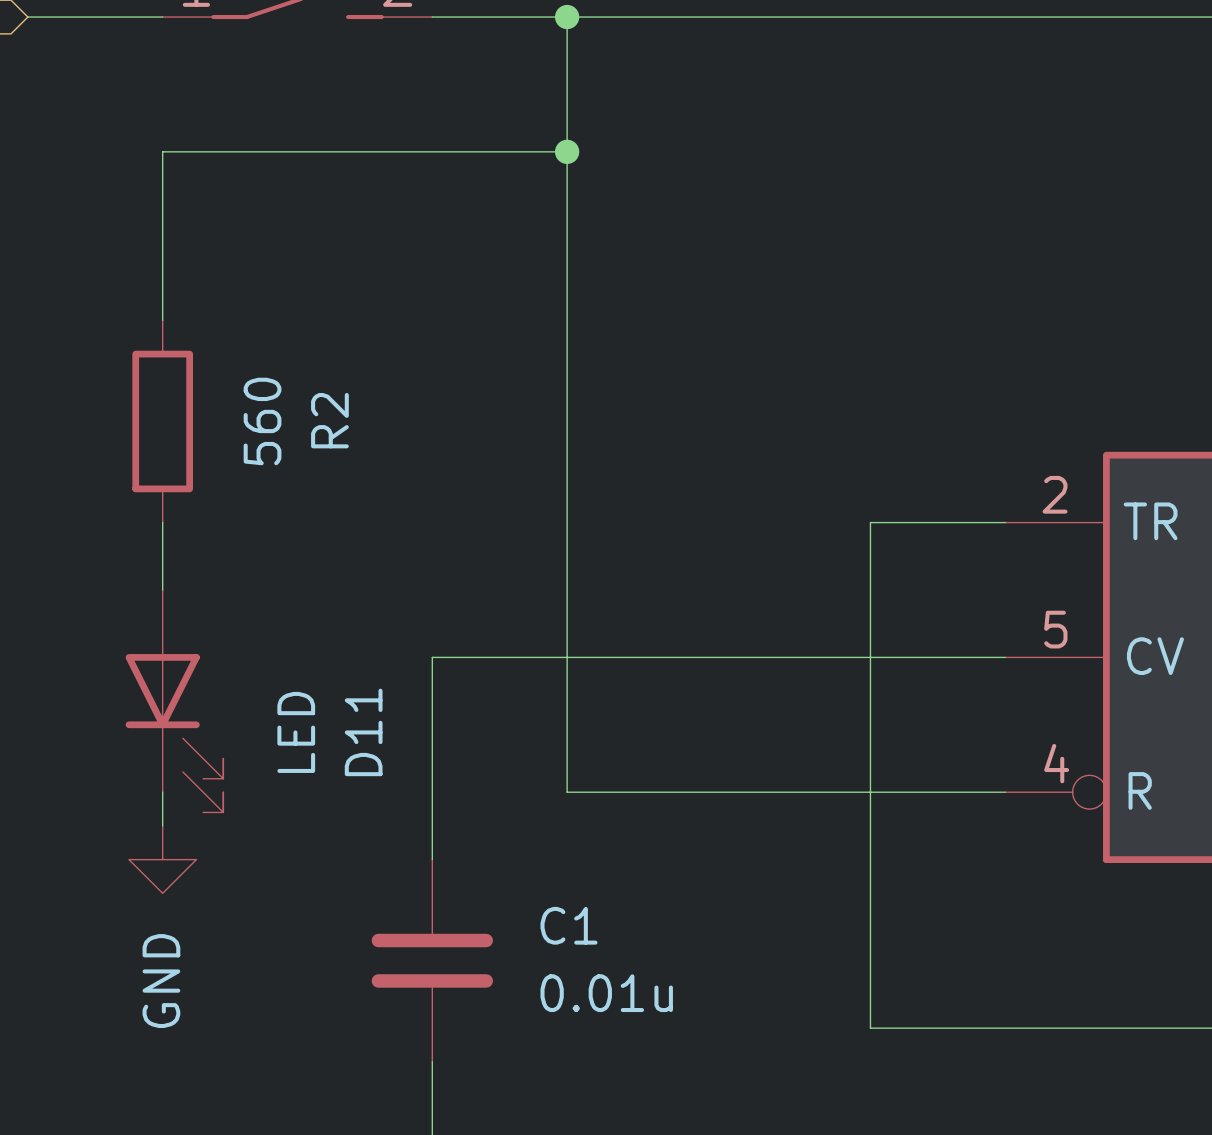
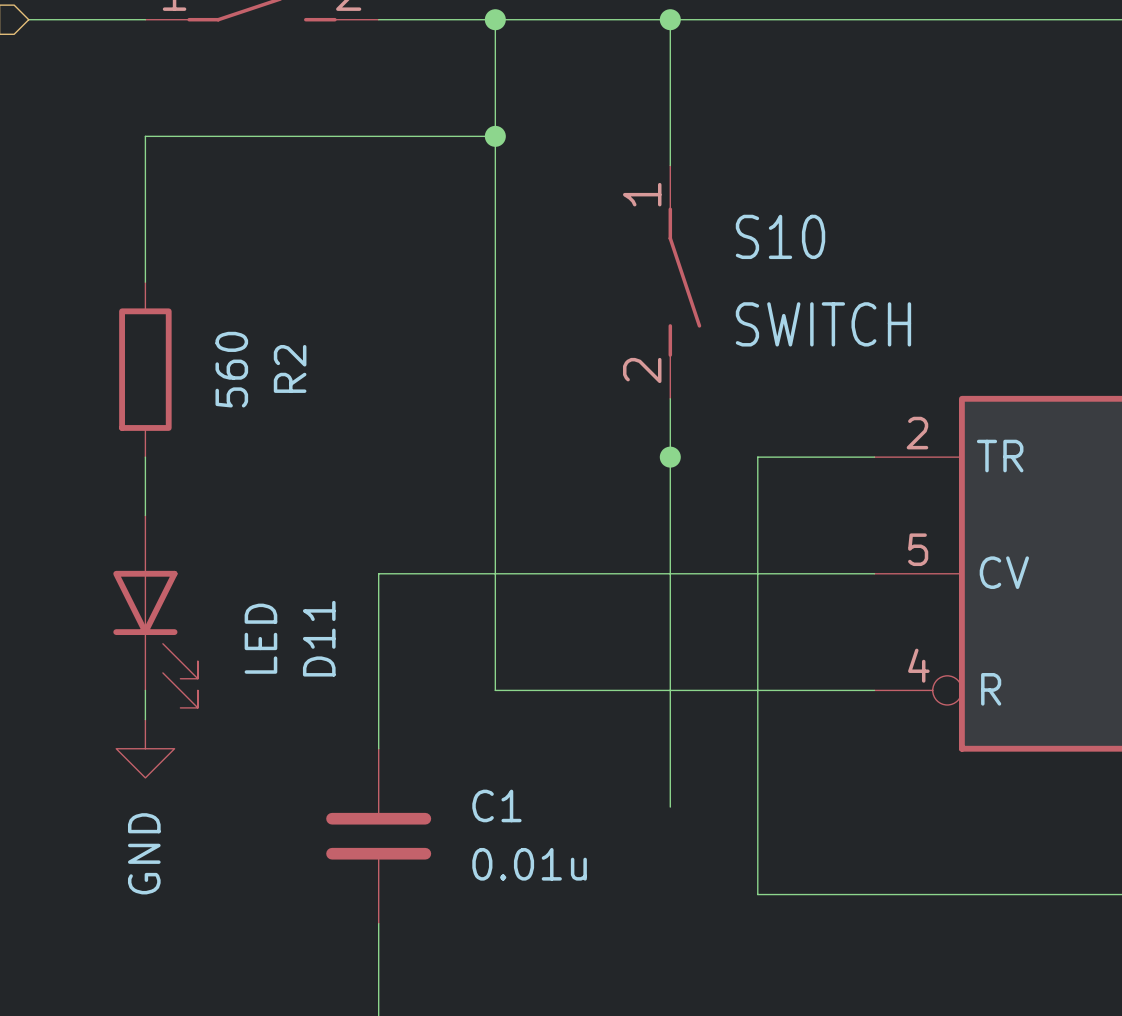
wire: none -> (670, 19) (670, 165)
junction: none -> (670, 19)
S10: none -> SWITCH (684, 282)
wire: none -> (670, 398) (670, 807)
junction: none -> (670, 457)

